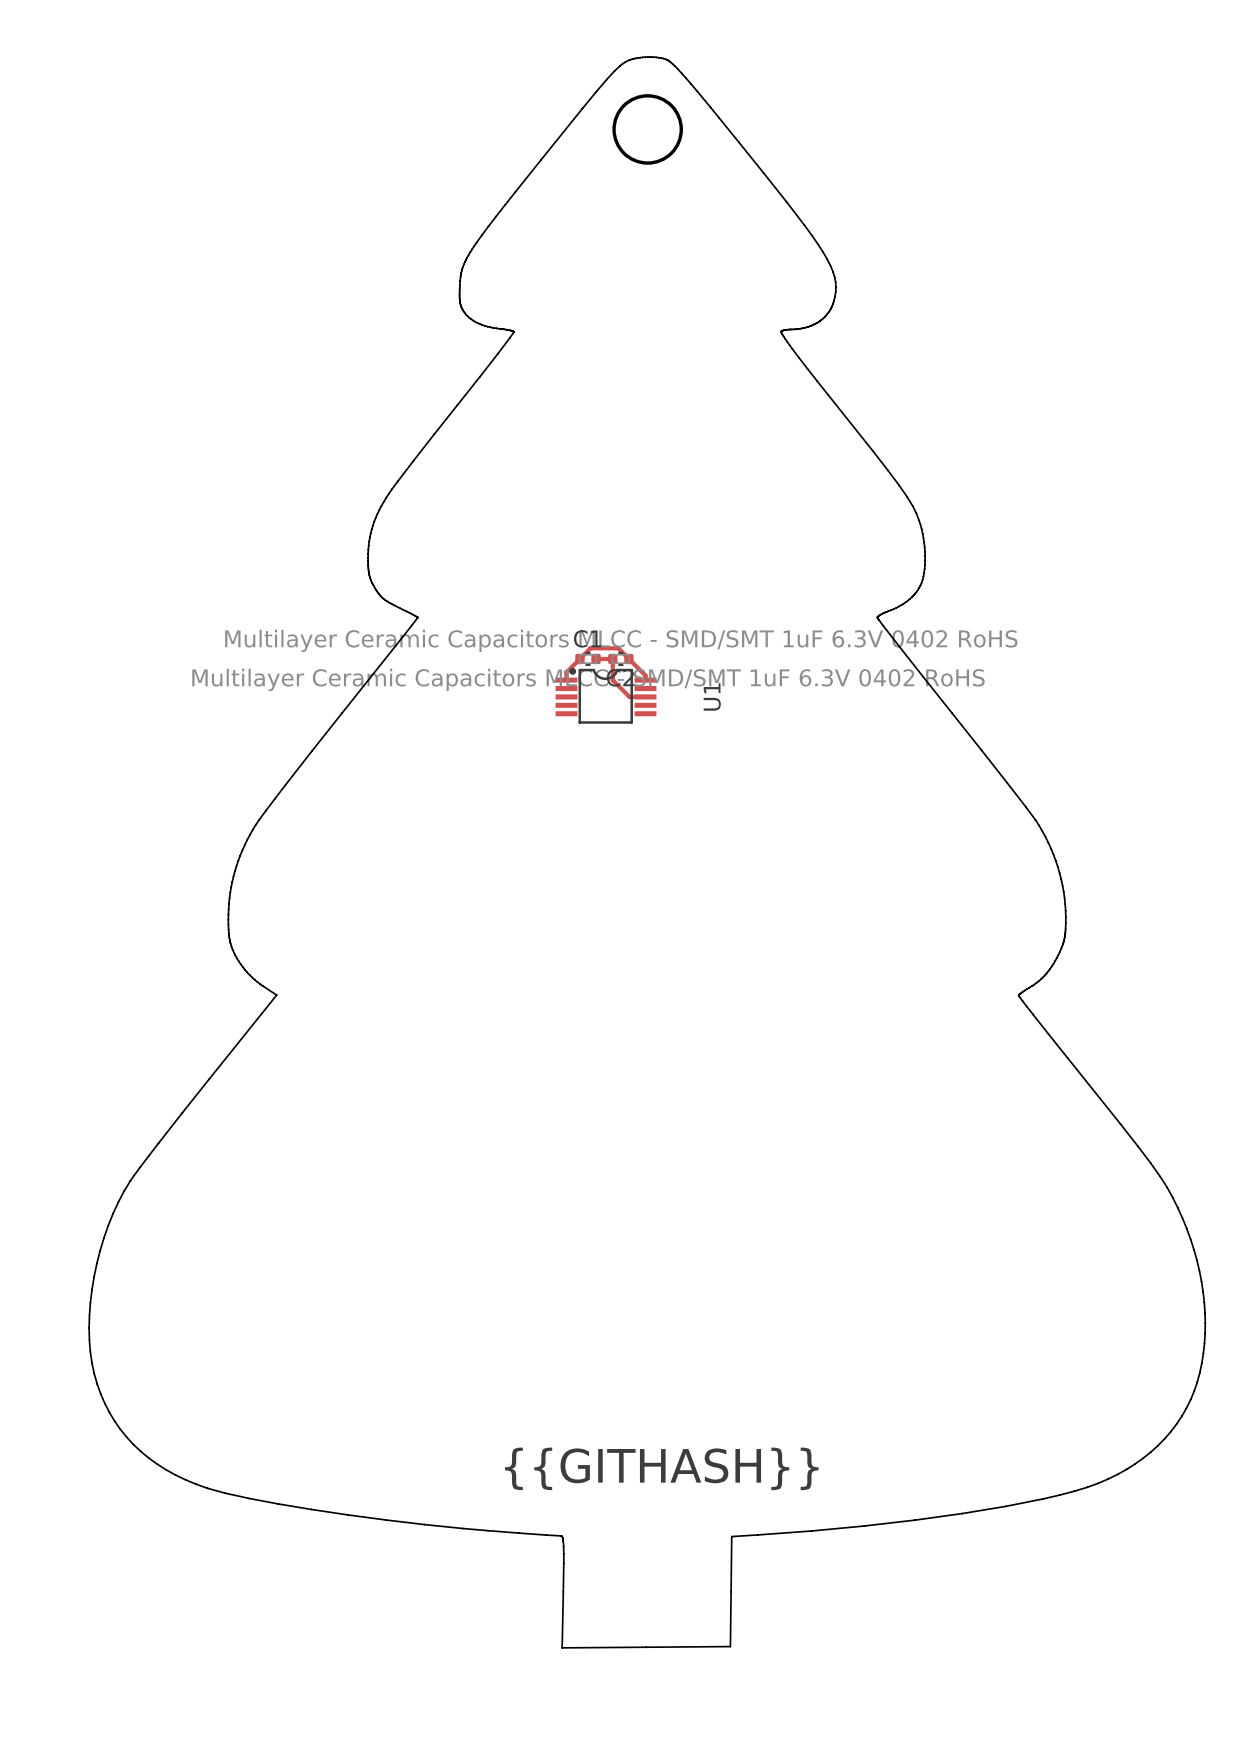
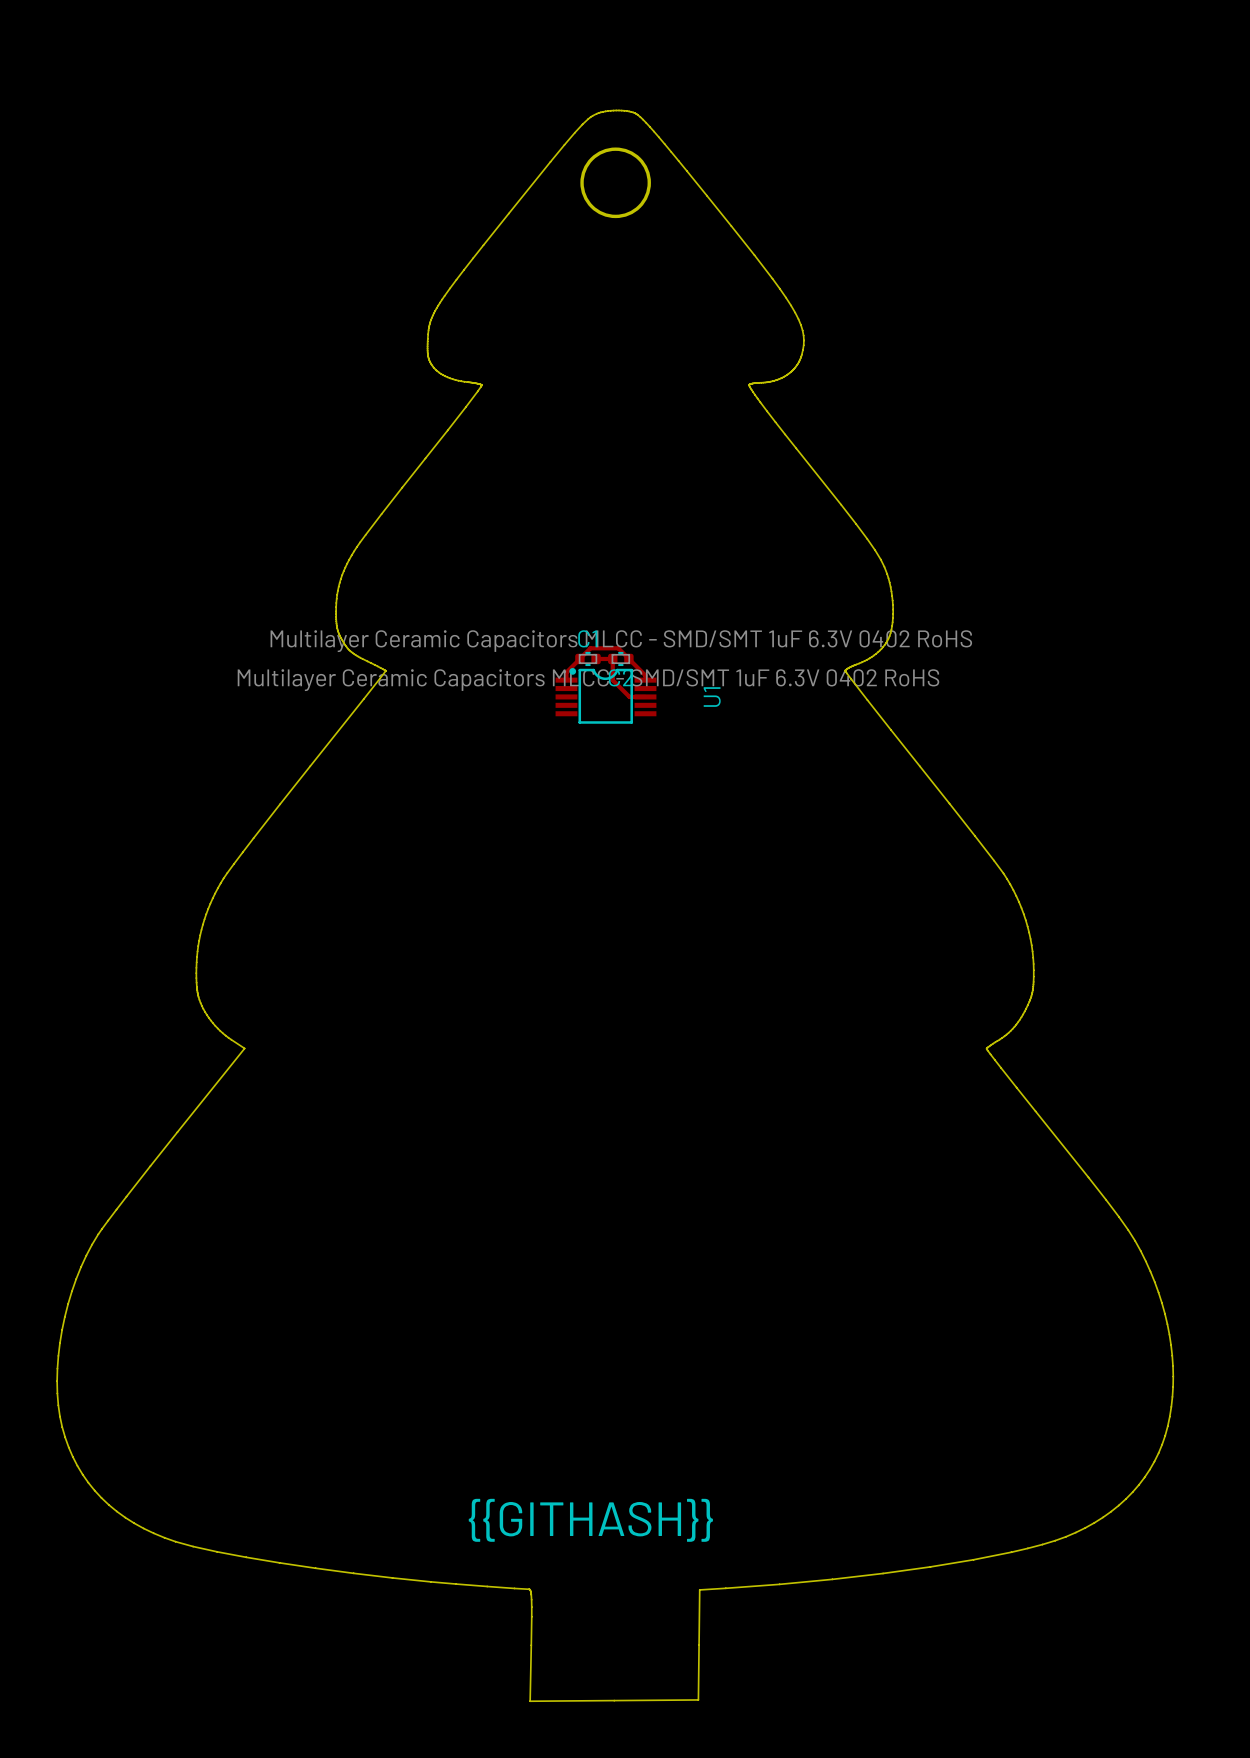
round board edge position: (647, 129) -> (615, 182)
board edge: (513, 331) (479, 323) (469, 317) (463, 311) (460, 301) (459, 288) (461, 272) (465, 259) (496, 216) (606, 79) (624, 62) (635, 58) (648, 57) (667, 60) (686, 78) (786, 201) (817, 244) (830, 265) (834, 277) (835, 291) (832, 304) (828, 313) (811, 325) (781, 331) -> (481, 384) (447, 377) (437, 371) (431, 364) (427, 355) (427, 341) (429, 326) (433, 313) (464, 269) (574, 132) (592, 115) (603, 111) (616, 110) (635, 113) (654, 131) (754, 255) (785, 297) (798, 319) (802, 330) (803, 345) (800, 358) (796, 366) (779, 379) (749, 384)
board edge: (513, 331) (392, 488) (381, 506) (372, 525) (368, 558) (369, 573) (372, 582) (385, 599) (417, 617) -> none
board edge: (781, 331) (799, 358) (899, 485) (912, 506) (919, 520) (924, 551) (924, 568) (921, 582) (908, 600) (877, 617) -> (749, 385) (767, 411) (867, 538) (880, 559) (887, 574) (892, 605) (892, 622) (889, 636) (876, 653) (845, 670)
board edge: none -> (481, 385) (360, 542) (349, 559) (340, 579) (336, 611) (336, 626) (340, 636) (353, 653) (385, 670) (233, 864) (217, 888) (206, 914) (197, 956) (198, 996) (204, 1011) (215, 1025) (244, 1048) (102, 1228) (86, 1255) (76, 1278) (68, 1304) (59, 1342) (57, 1393) (59, 1416) (65, 1437) (72, 1456) (88, 1482) (108, 1504) (134, 1523) (164, 1537) (193, 1546) (246, 1557) (353, 1573) (529, 1589) (531, 1607) (530, 1701) (698, 1699) (699, 1589) (832, 1579) (930, 1566) (1027, 1548) (1075, 1532) (1103, 1517) (1125, 1498) (1144, 1477) (1158, 1453) (1167, 1426) (1172, 1396) (1173, 1366) (1169, 1334) (1154, 1282) (1140, 1250) (1128, 1230) (986, 1048)
board edge: (417, 617) (274, 799) (247, 840) (238, 860) (231, 887) (228, 914) (229, 940) (235, 955) (245, 969) (257, 982) (276, 995) (130, 1180) (113, 1213) (100, 1250) (92, 1289) (89, 1327) (91, 1363) (97, 1384) (104, 1403) (120, 1429) (140, 1451) (166, 1469) (207, 1488) (278, 1503) (424, 1524) (561, 1536) (563, 1553) (562, 1647) (730, 1646) (731, 1536) (864, 1525) (962, 1513) (1059, 1495) (1087, 1487) (1117, 1474) (1143, 1458) (1164, 1438) (1181, 1416) (1194, 1391) (1201, 1363) (1205, 1333) (1204, 1302) (1199, 1270) (1182, 1218) (1160, 1176) (1018, 995) -> none
board edge: (877, 617) (1026, 807) (1042, 831) (1053, 854) (1064, 898) (1065, 923) (1063, 940) (1056, 958) (1046, 973) (1018, 995) -> (845, 671) (994, 860) (1010, 884) (1021, 908) (1032, 951) (1033, 976) (1031, 994) (1024, 1011) (1014, 1026) (986, 1048)
text position: {{GITHASH}} (661, 1468) -> {{GITHASH}} (590, 1520)

